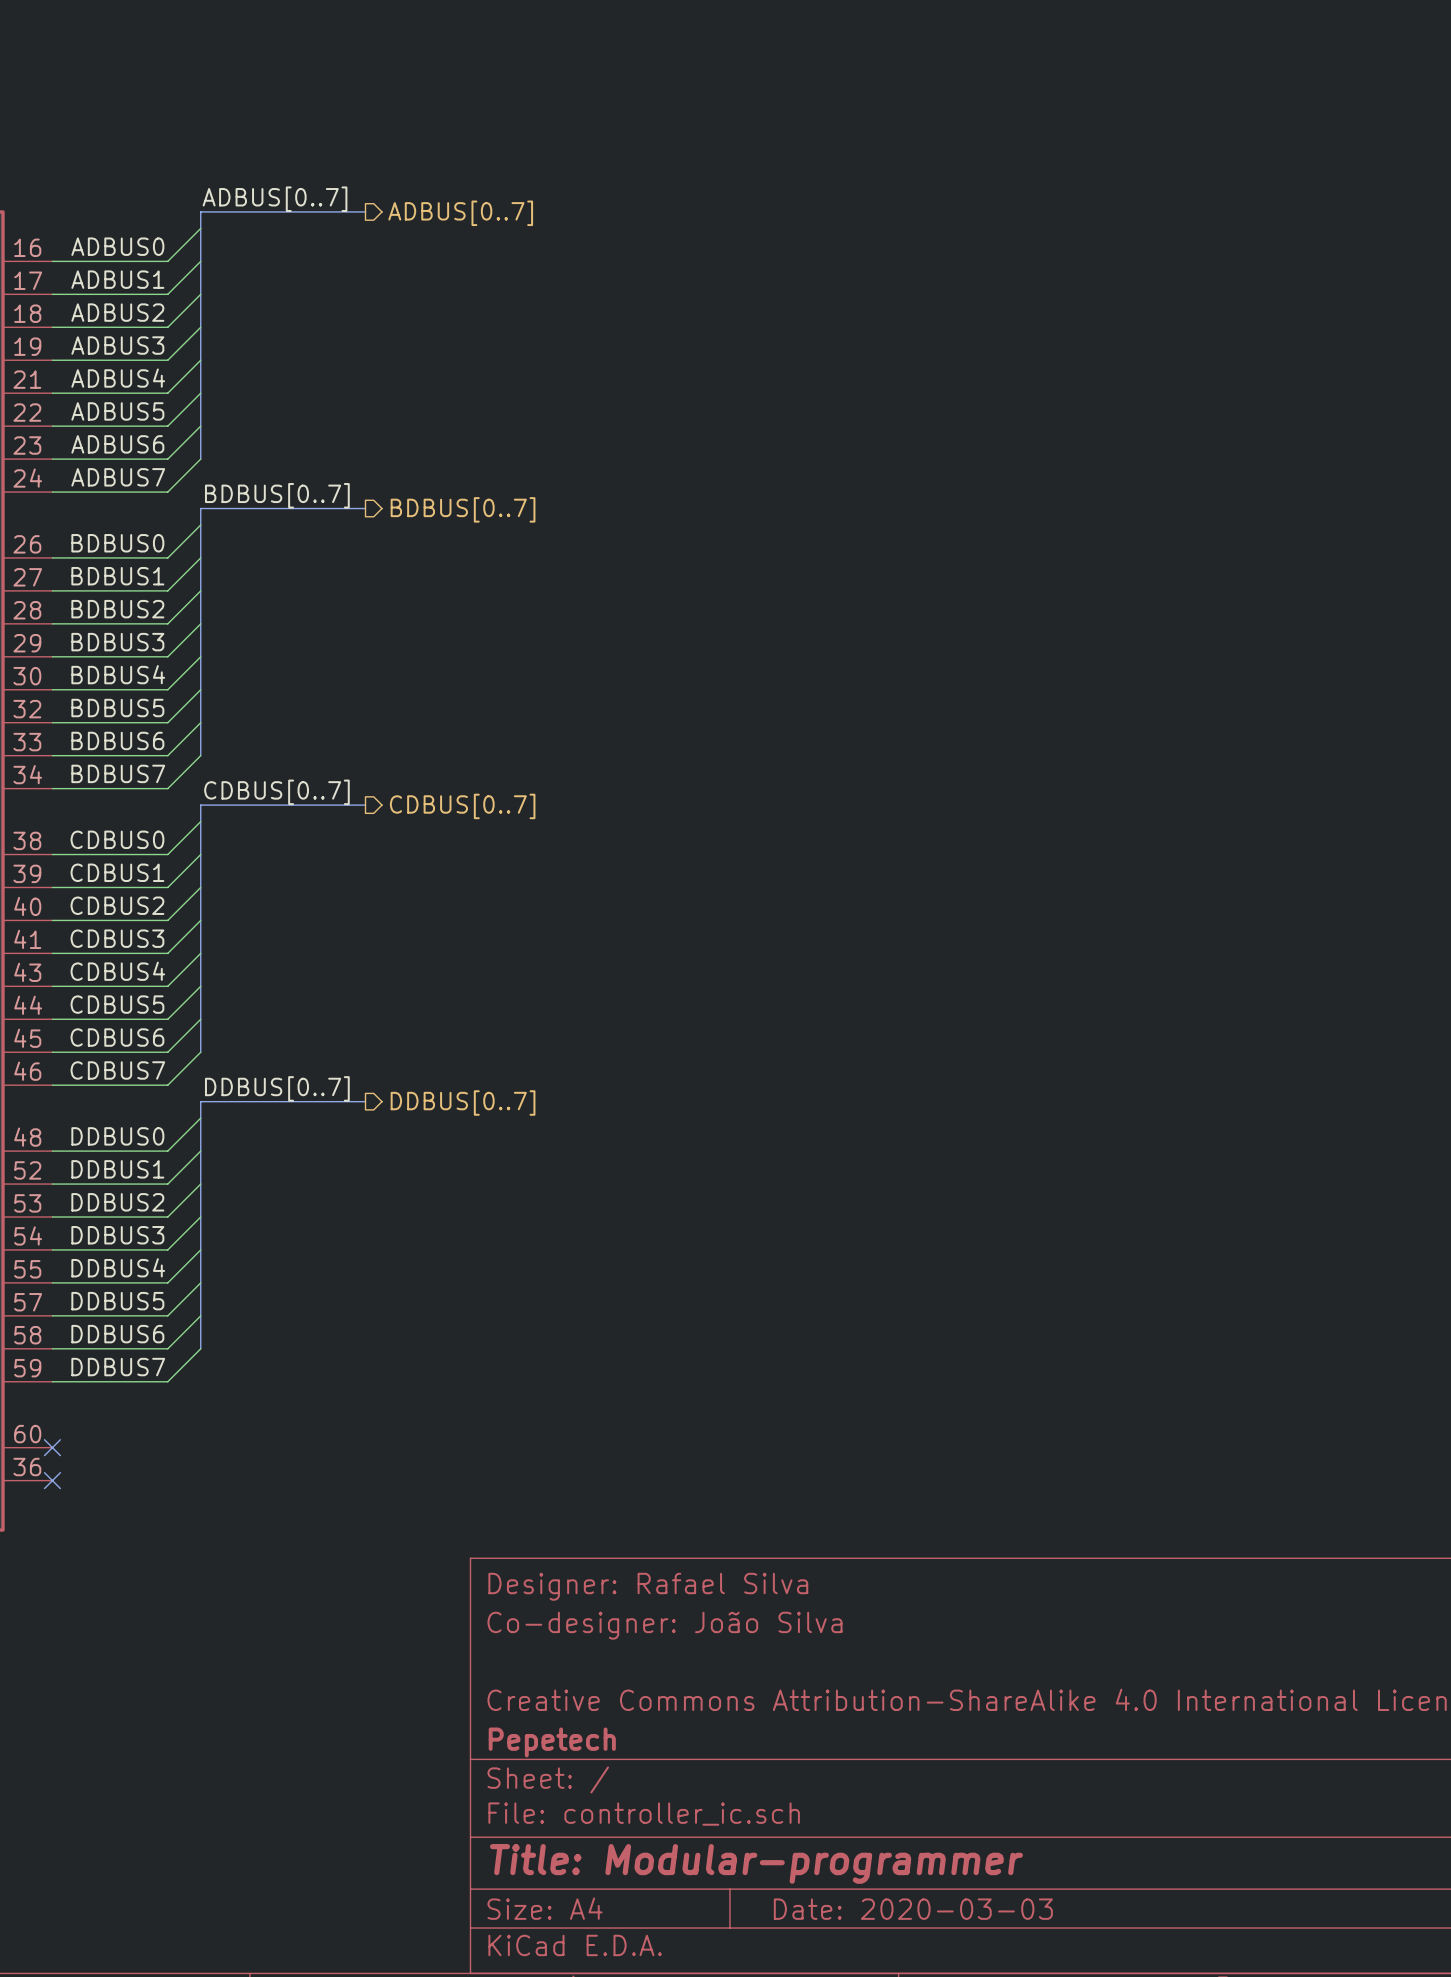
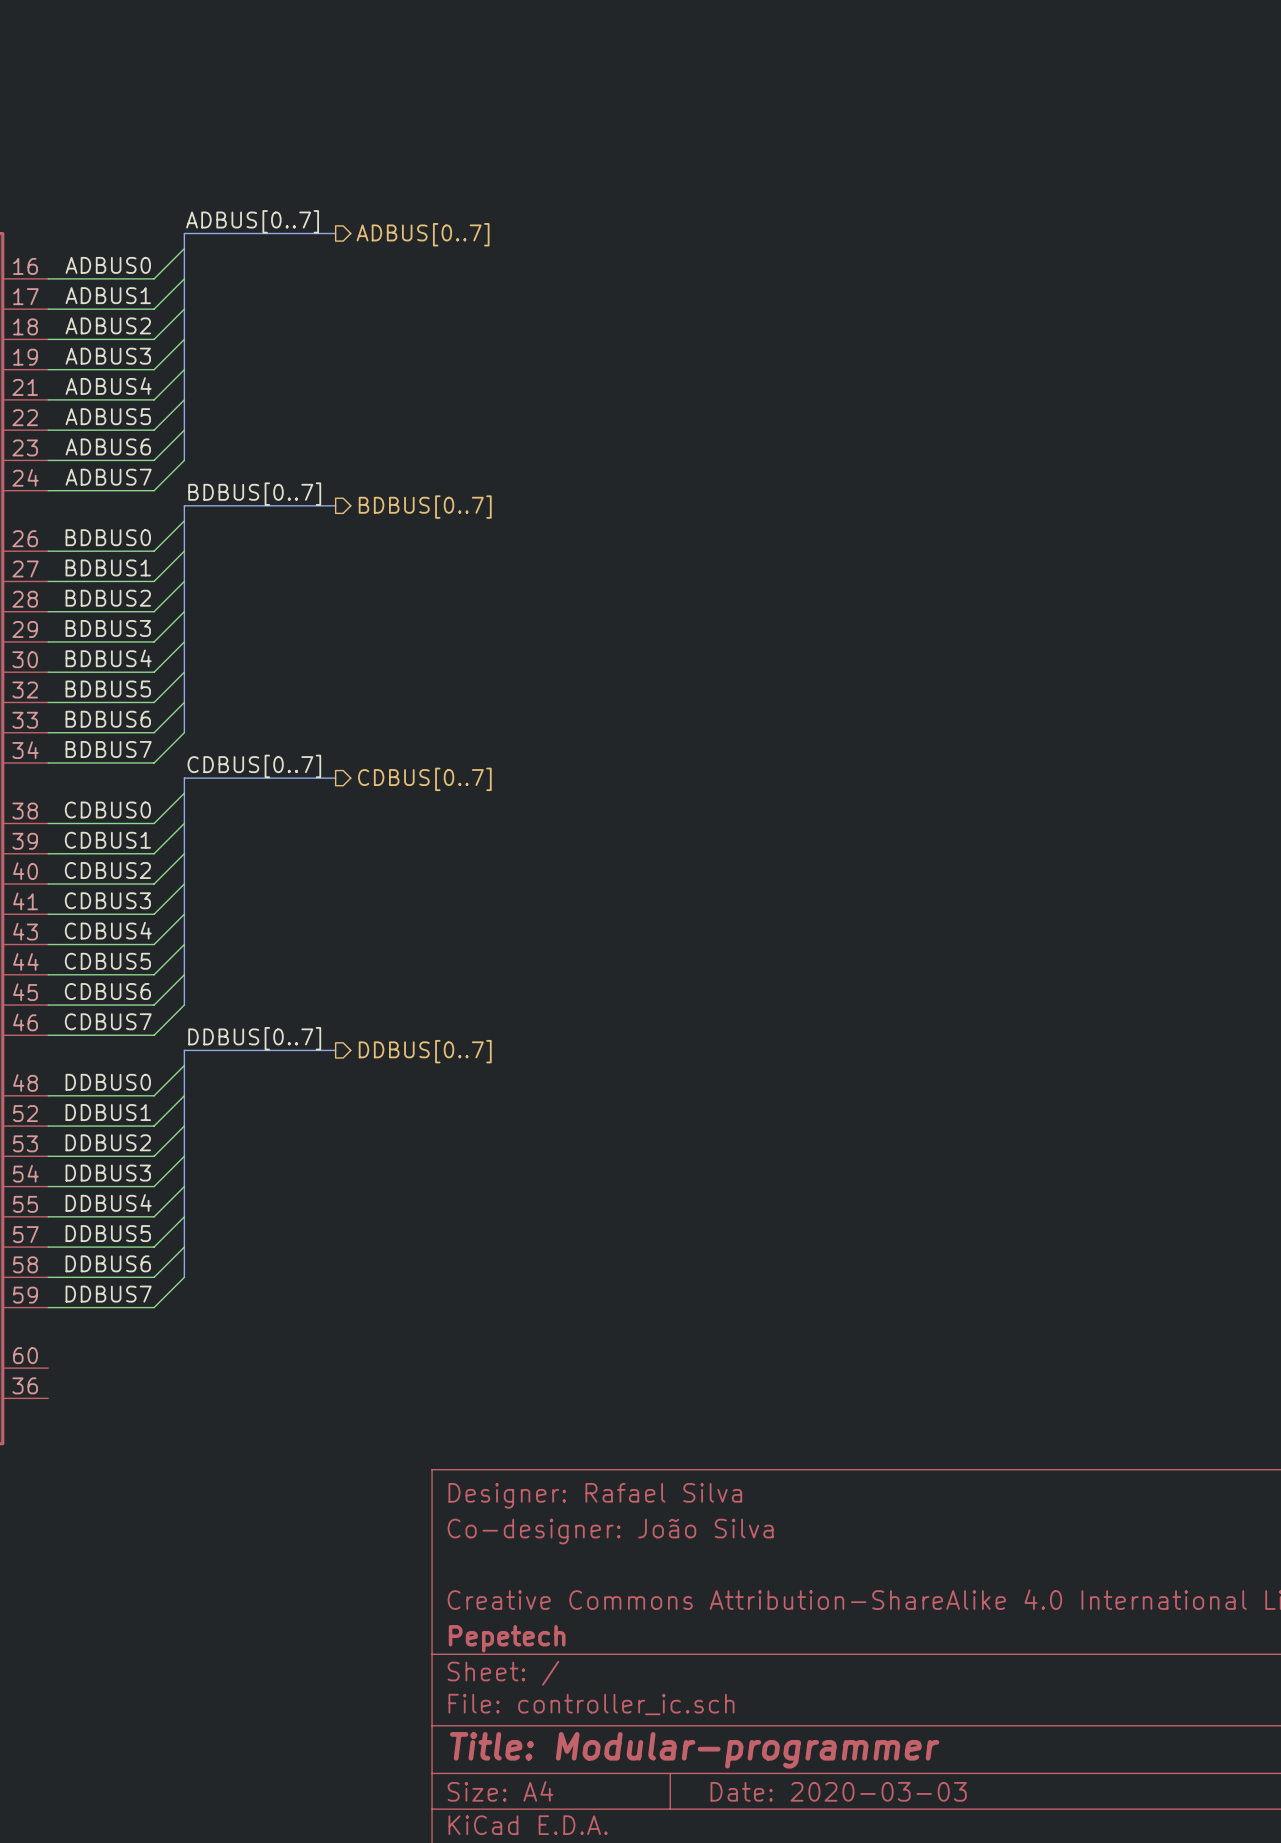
no-connect mark: (52, 1447) -> none
no-connect mark: (52, 1480) -> none

